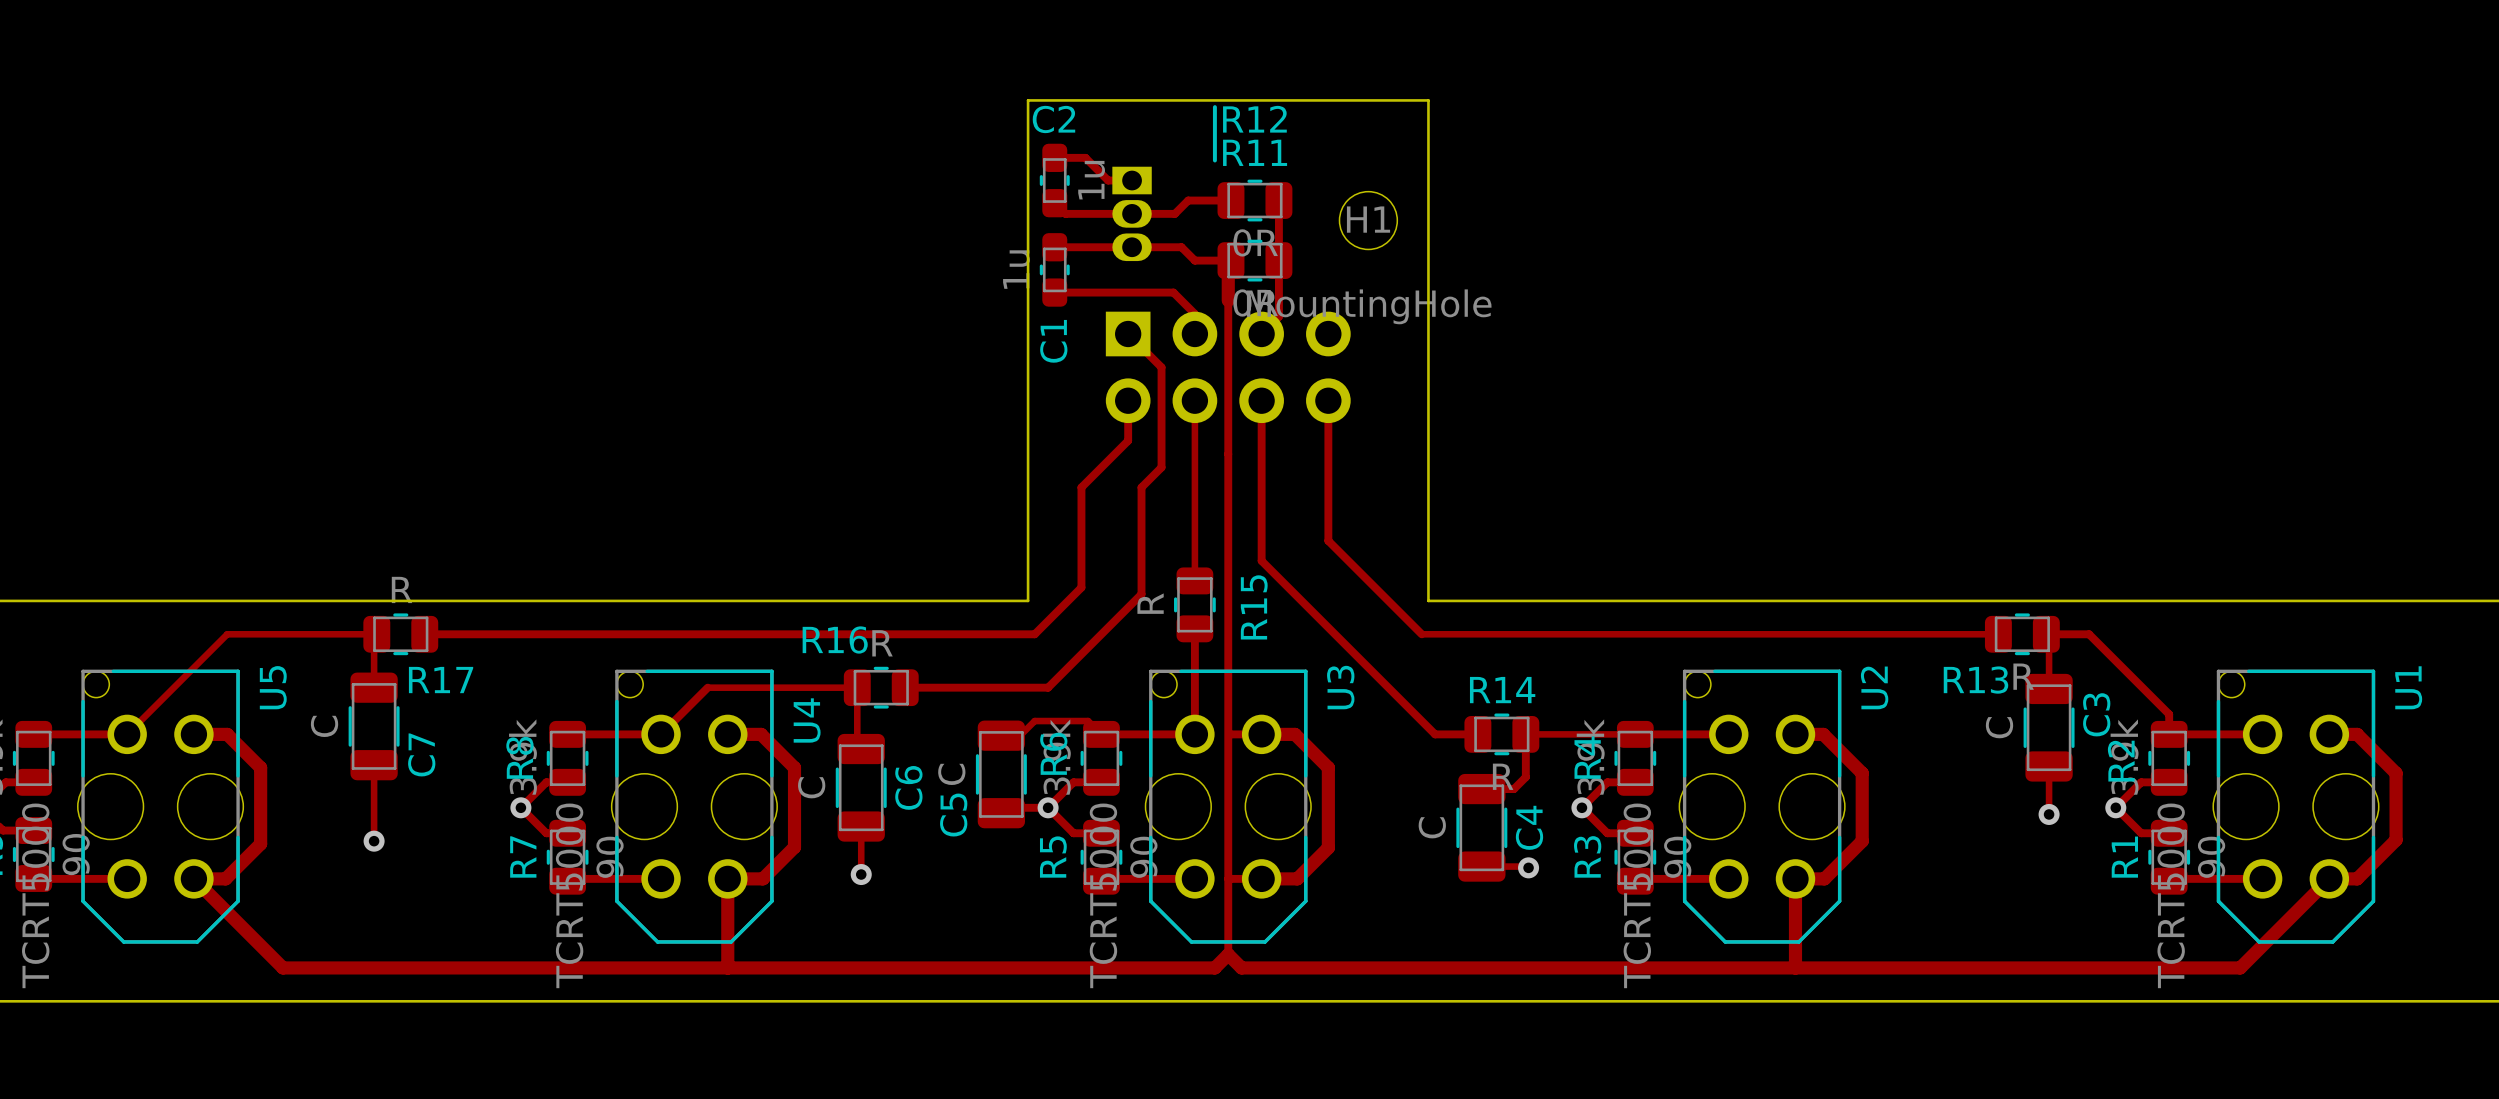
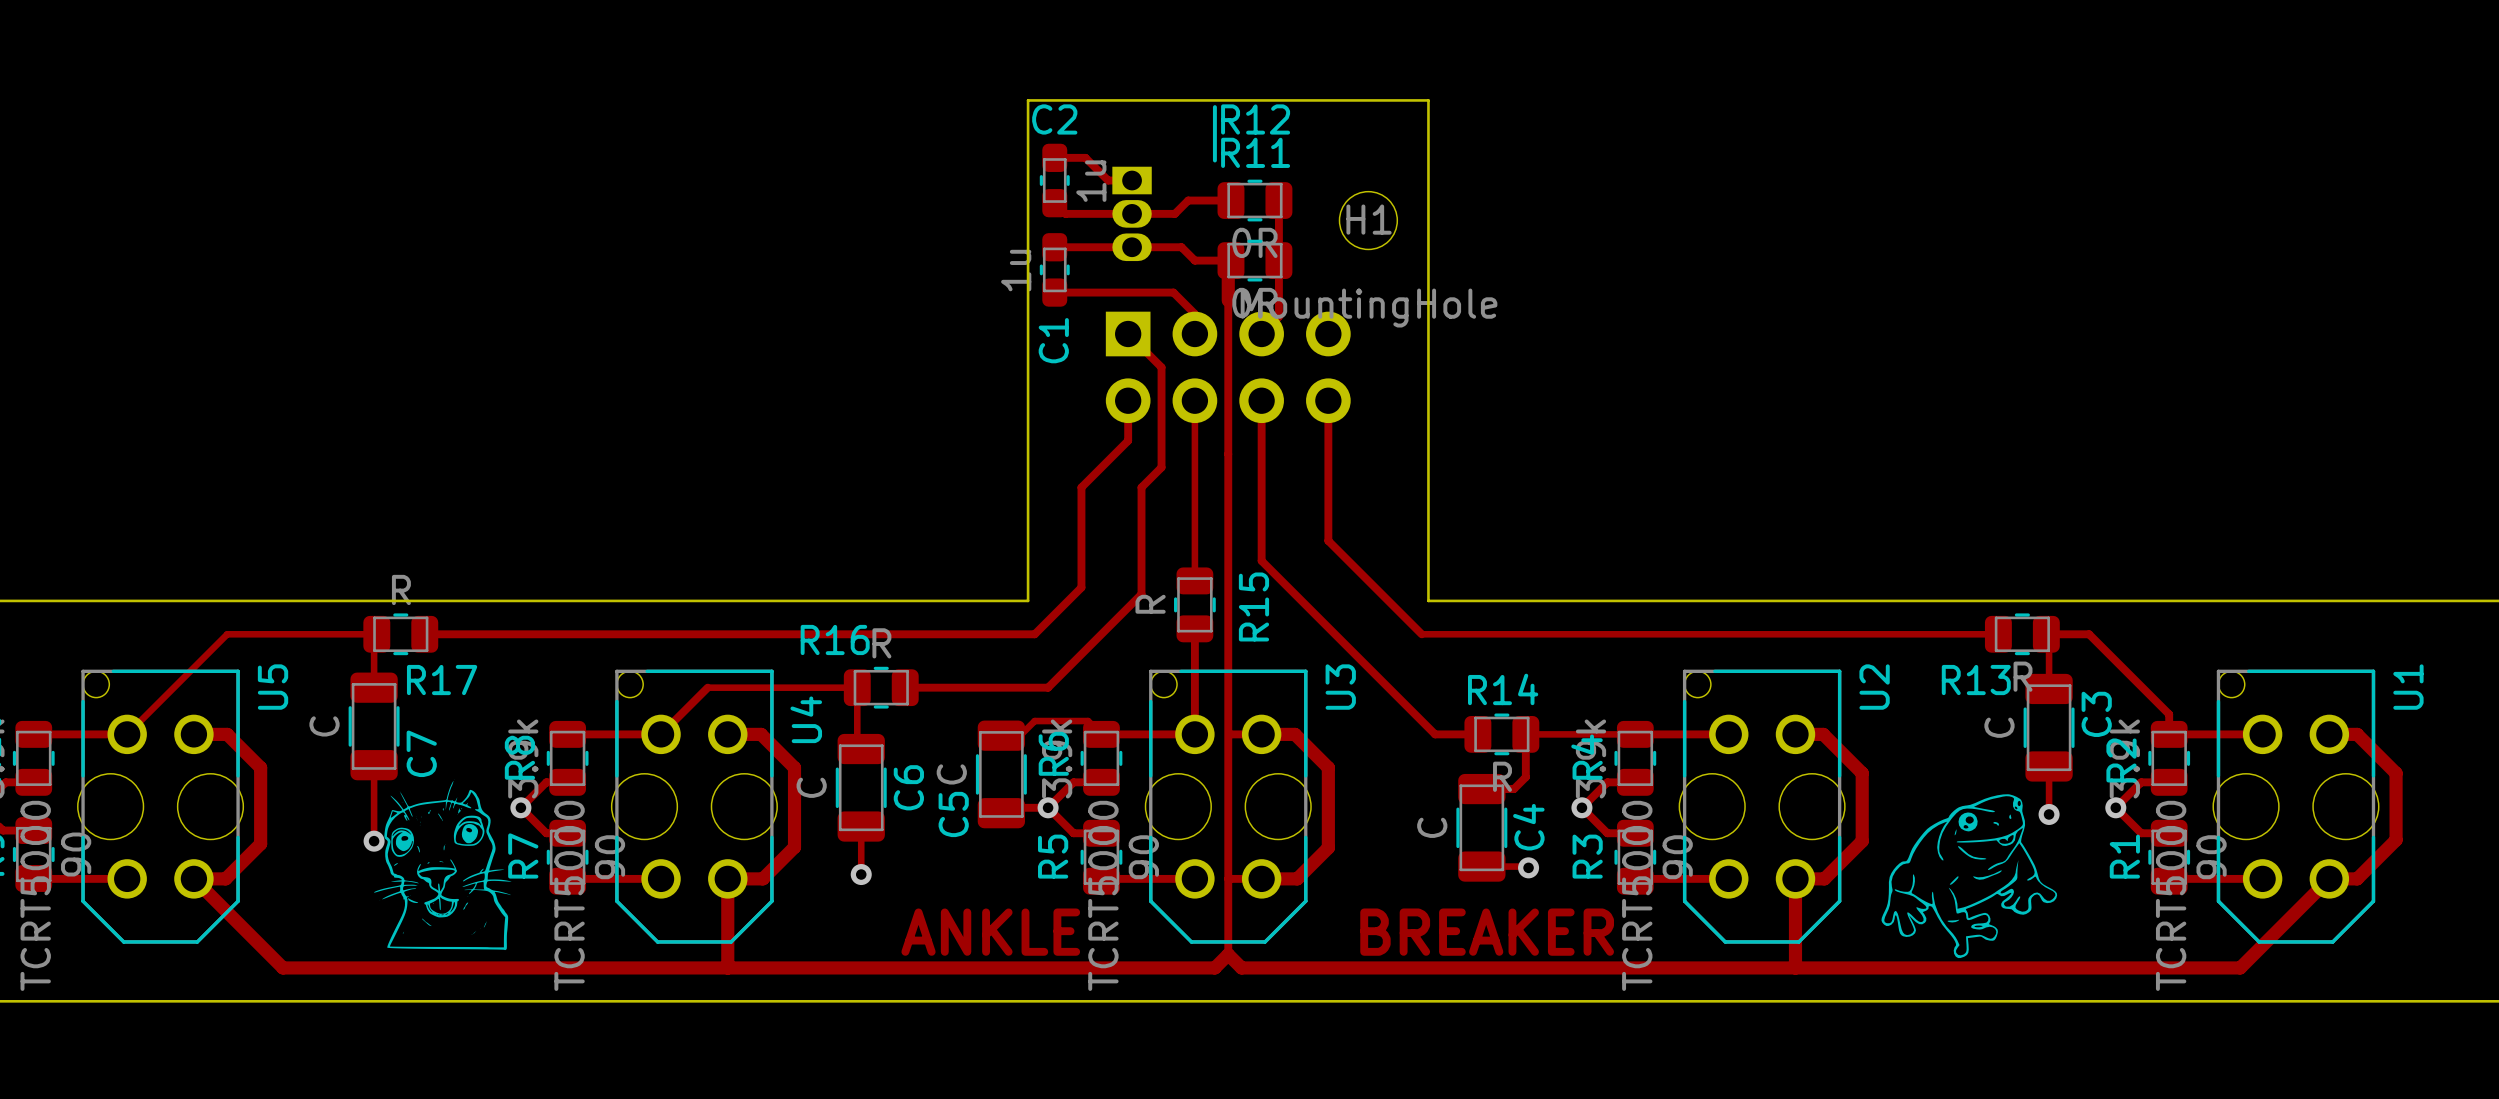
drawing: none -> [374, 779, 512, 951]
drawing: none -> [1881, 794, 2058, 959]
text: none -> ANKLE (990, 932)
text: none -> BREAKER (1487, 932)

